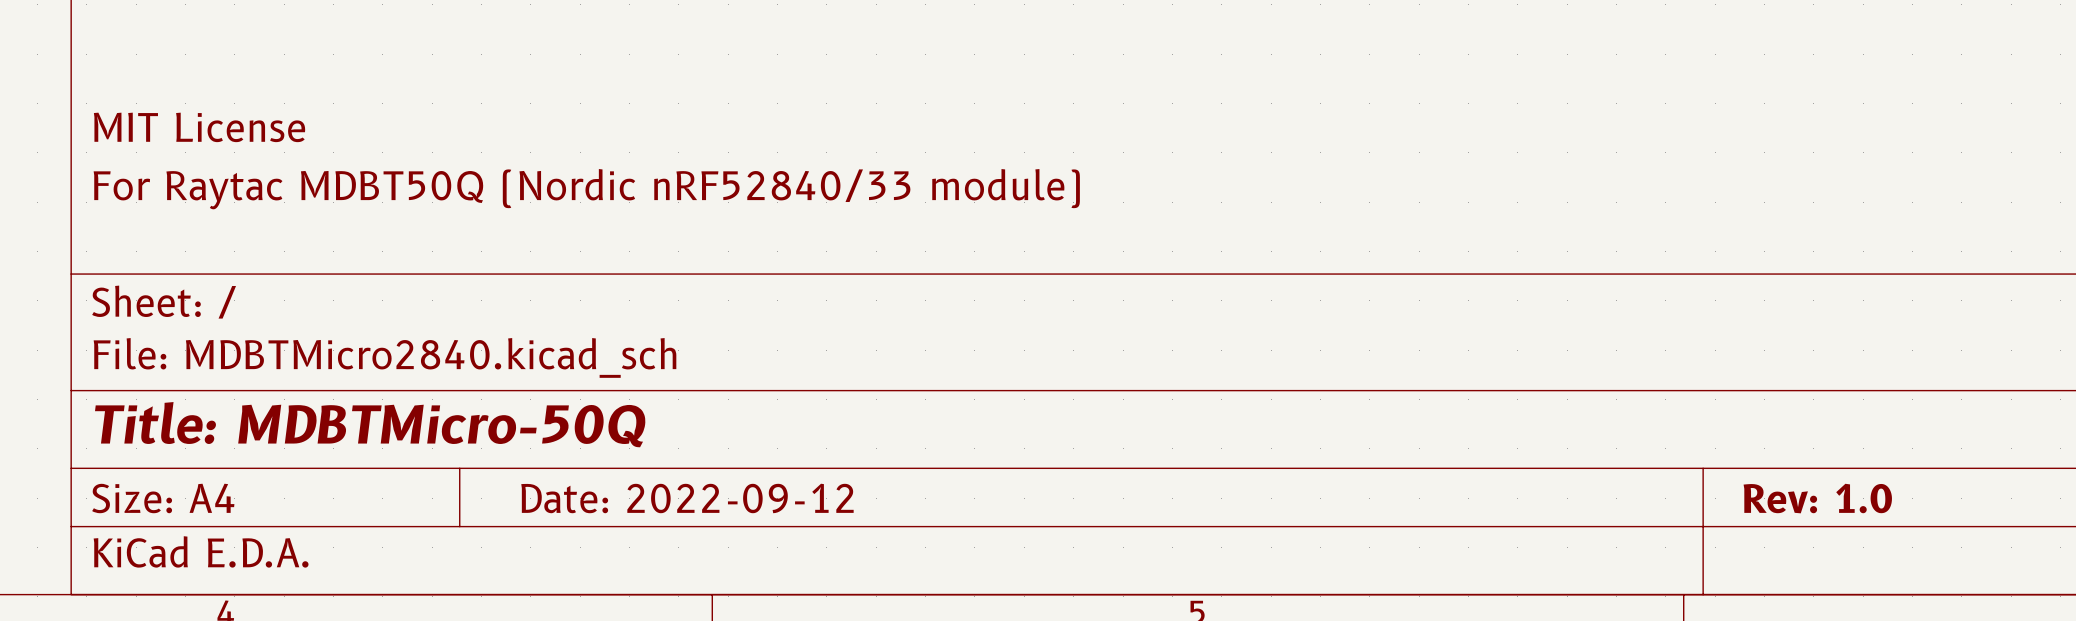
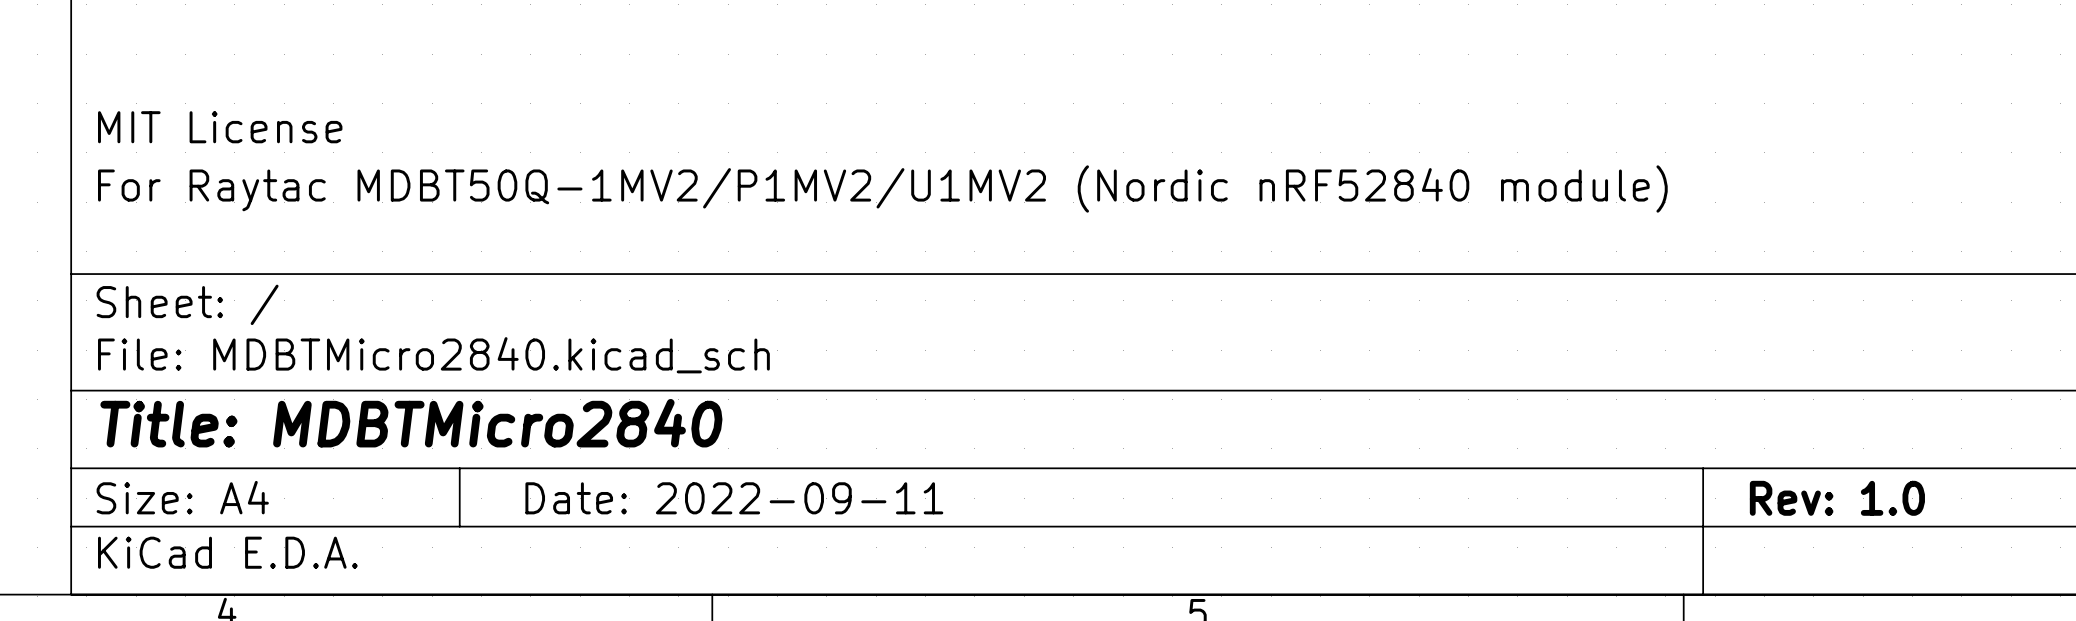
title block: For Raytac MDBT50Q (Nordic nRF52840/33 module) (586, 189) -> For Raytac MDBT50Q-1MV2/P1MV2/U1MV2 (Nordic nRF52840 module) (882, 188)
title block: Title: MDBTMicro-50Q (370, 424) -> Title: MDBTMicro2840 (411, 423)
title block: Date: 2022-09-12 (687, 498) -> Date: 2022-09-11 (734, 498)

